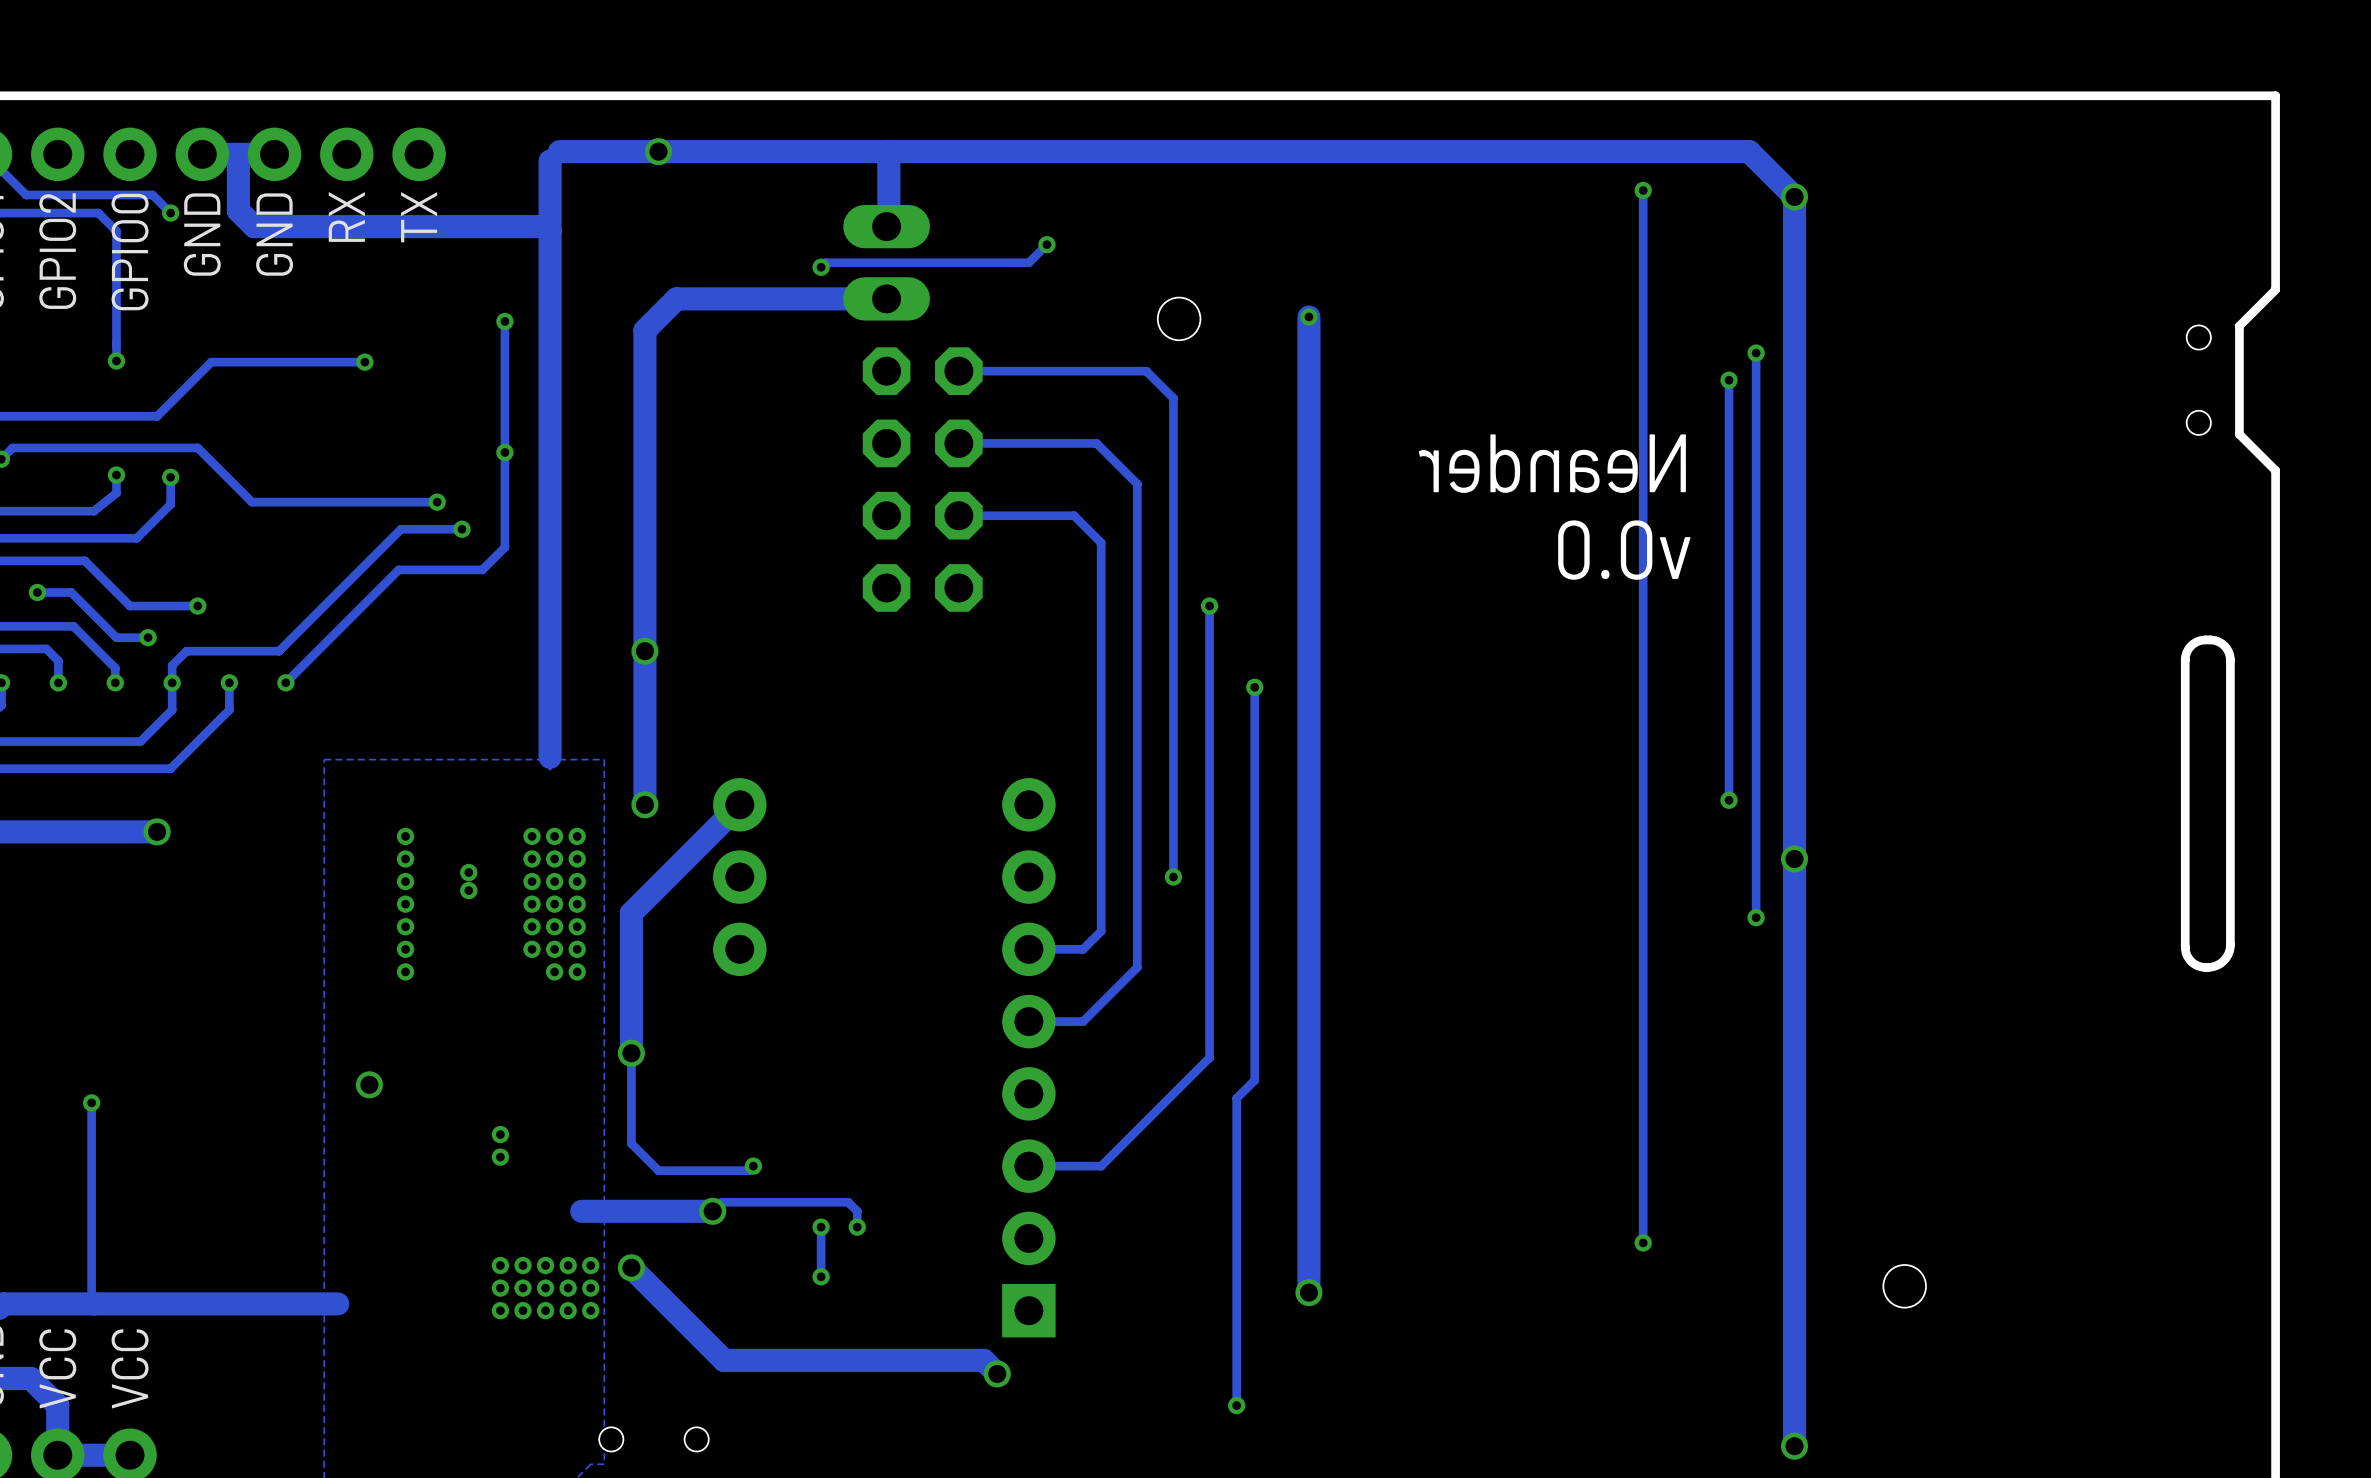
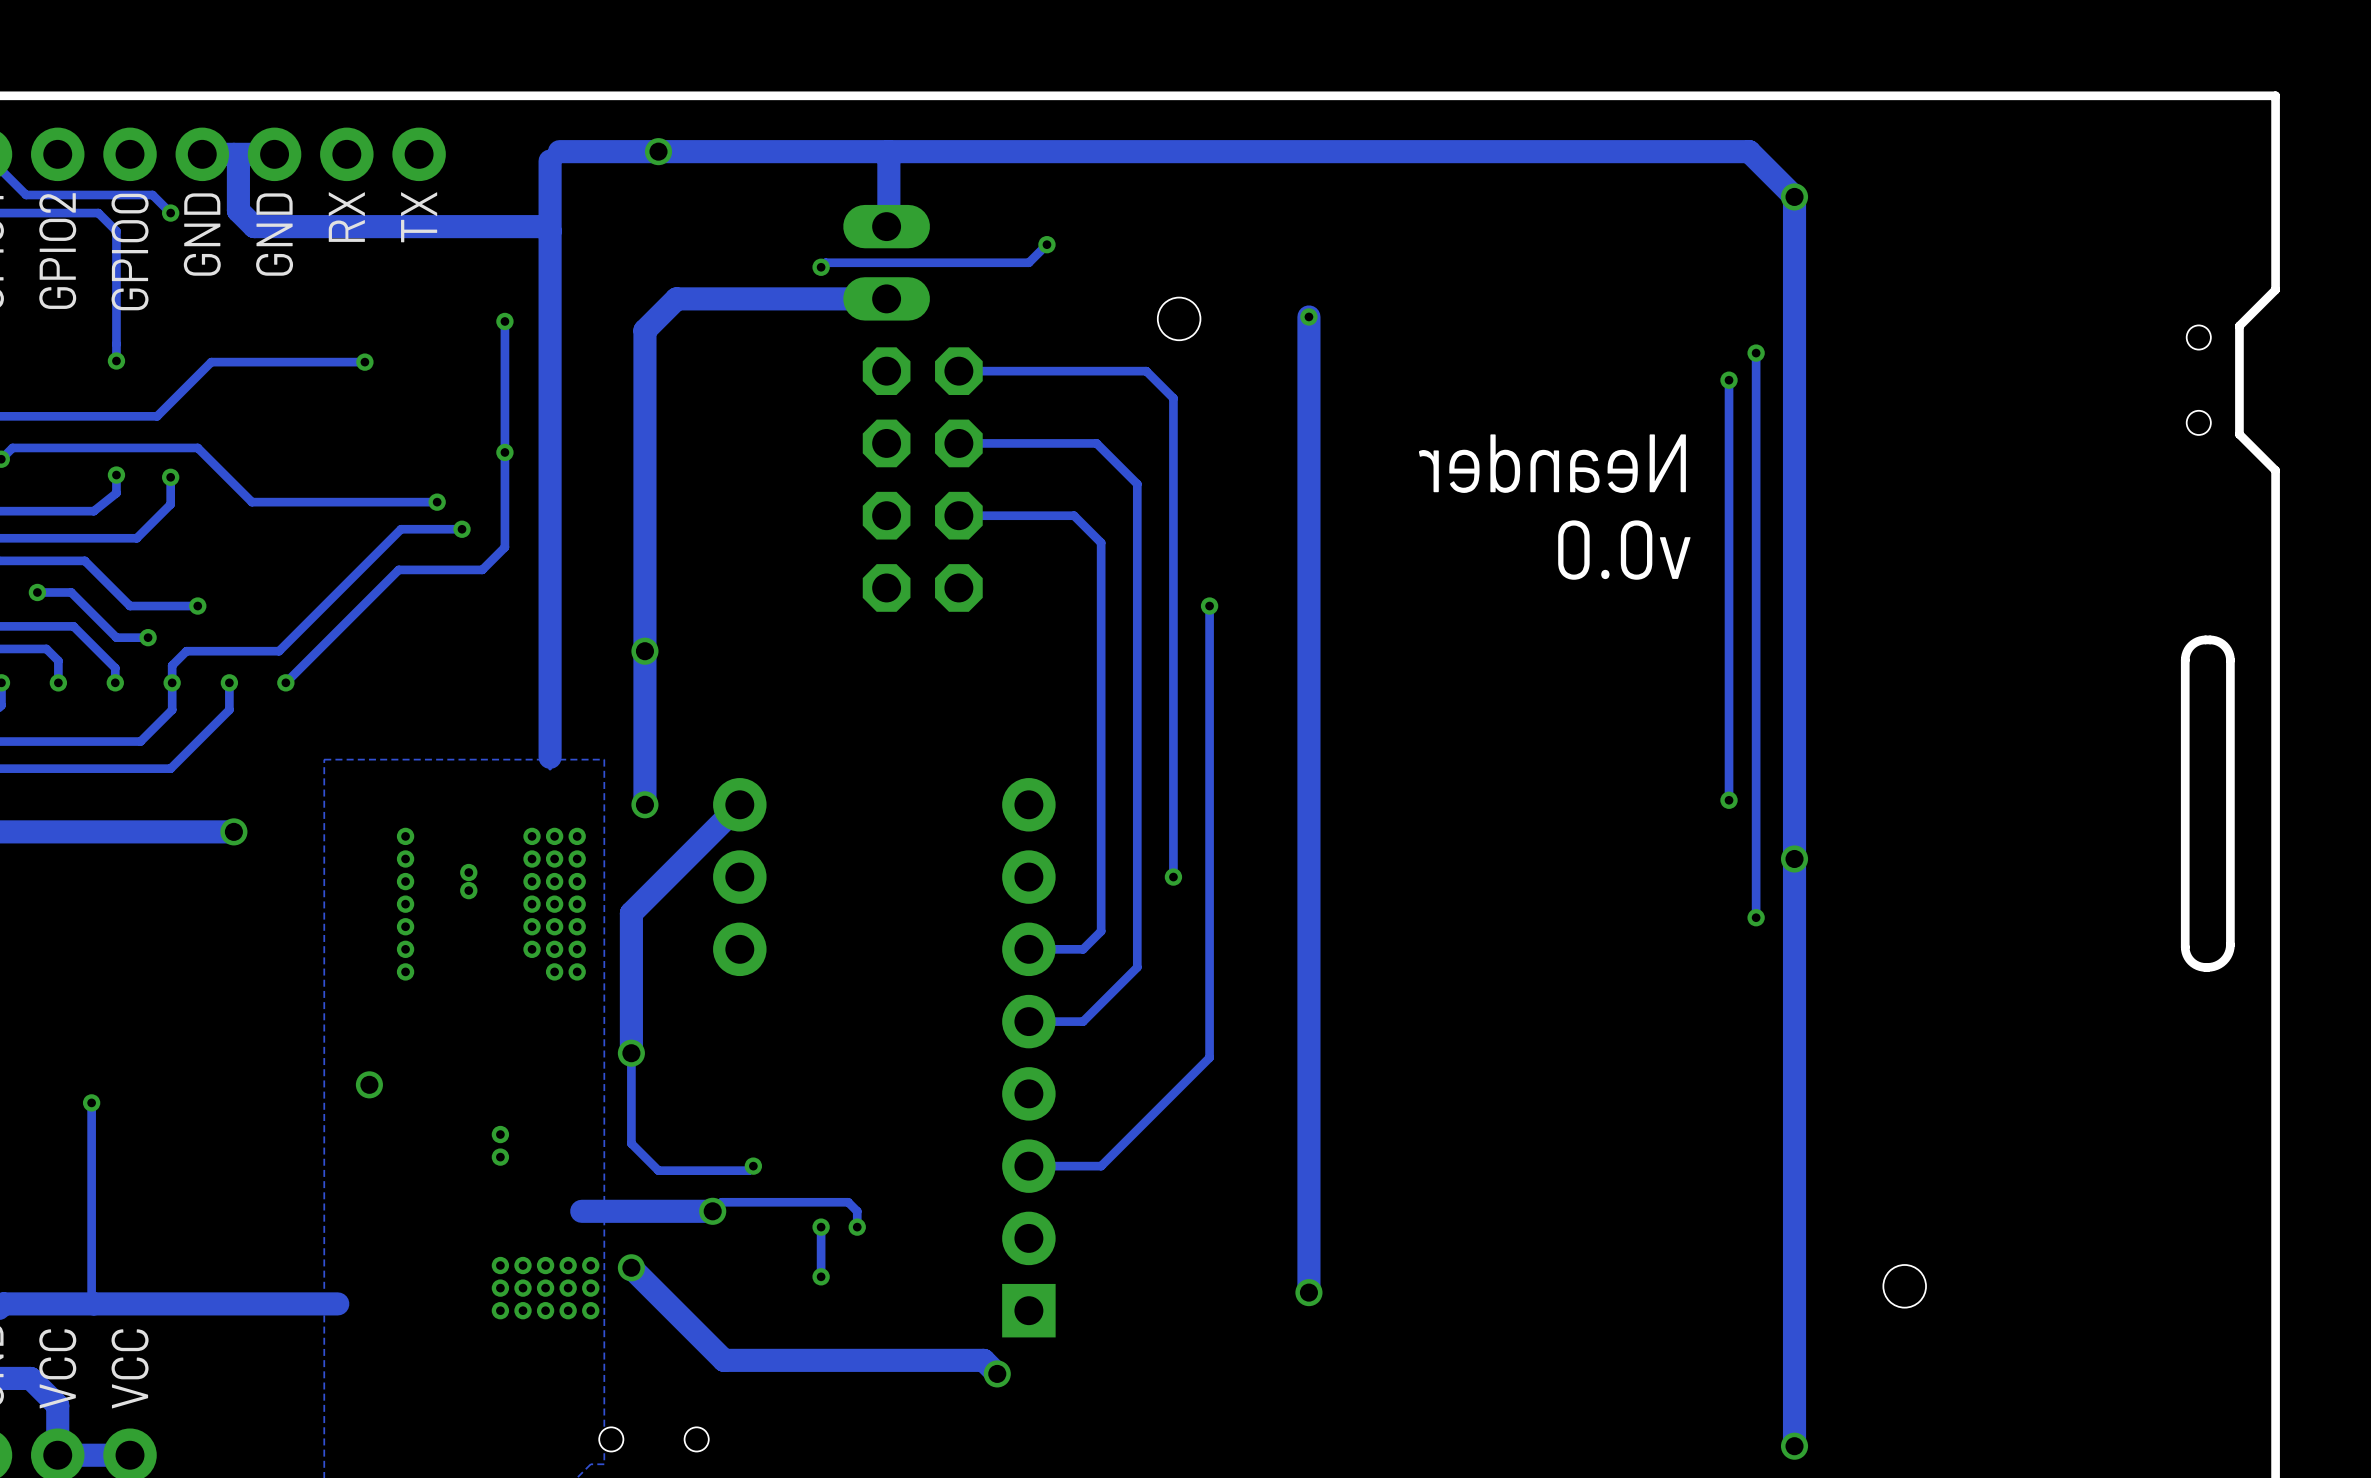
track: (1643, 190) (1643, 1242) -> none
via: (1643, 190) -> none
track: (1254, 687) (1254, 1080) (1236, 1098) (1236, 1405) -> none
via: (1254, 687) -> none
via position: (157, 831) -> (233, 831)
track: none -> (233, 831) (157, 831)
via: (1643, 1242) -> none
via: (1236, 1405) -> none

